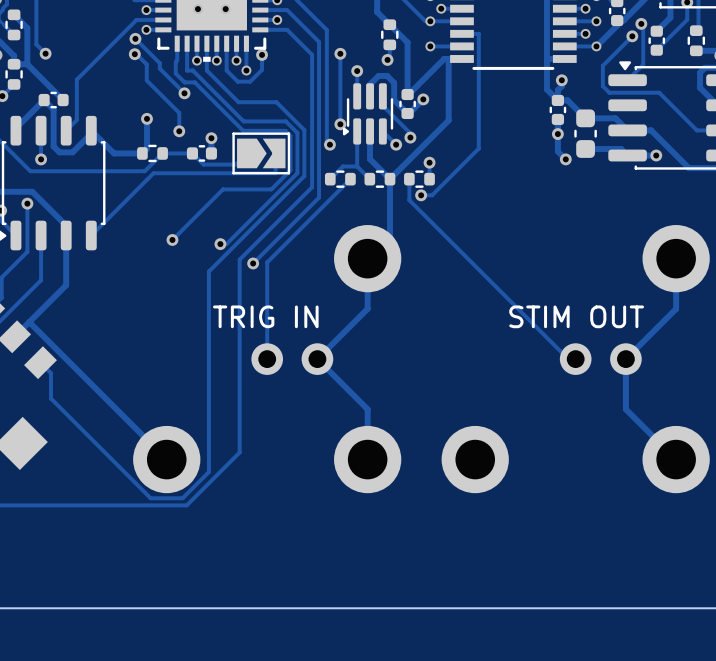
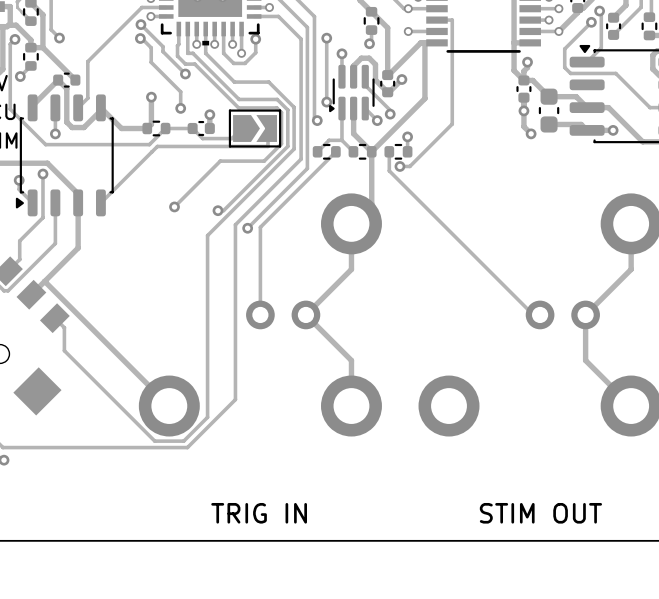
text position: TRIG IN (265, 316) -> TRIG IN (259, 513)
text position: STIM OUT (576, 316) -> STIM OUT (540, 513)

